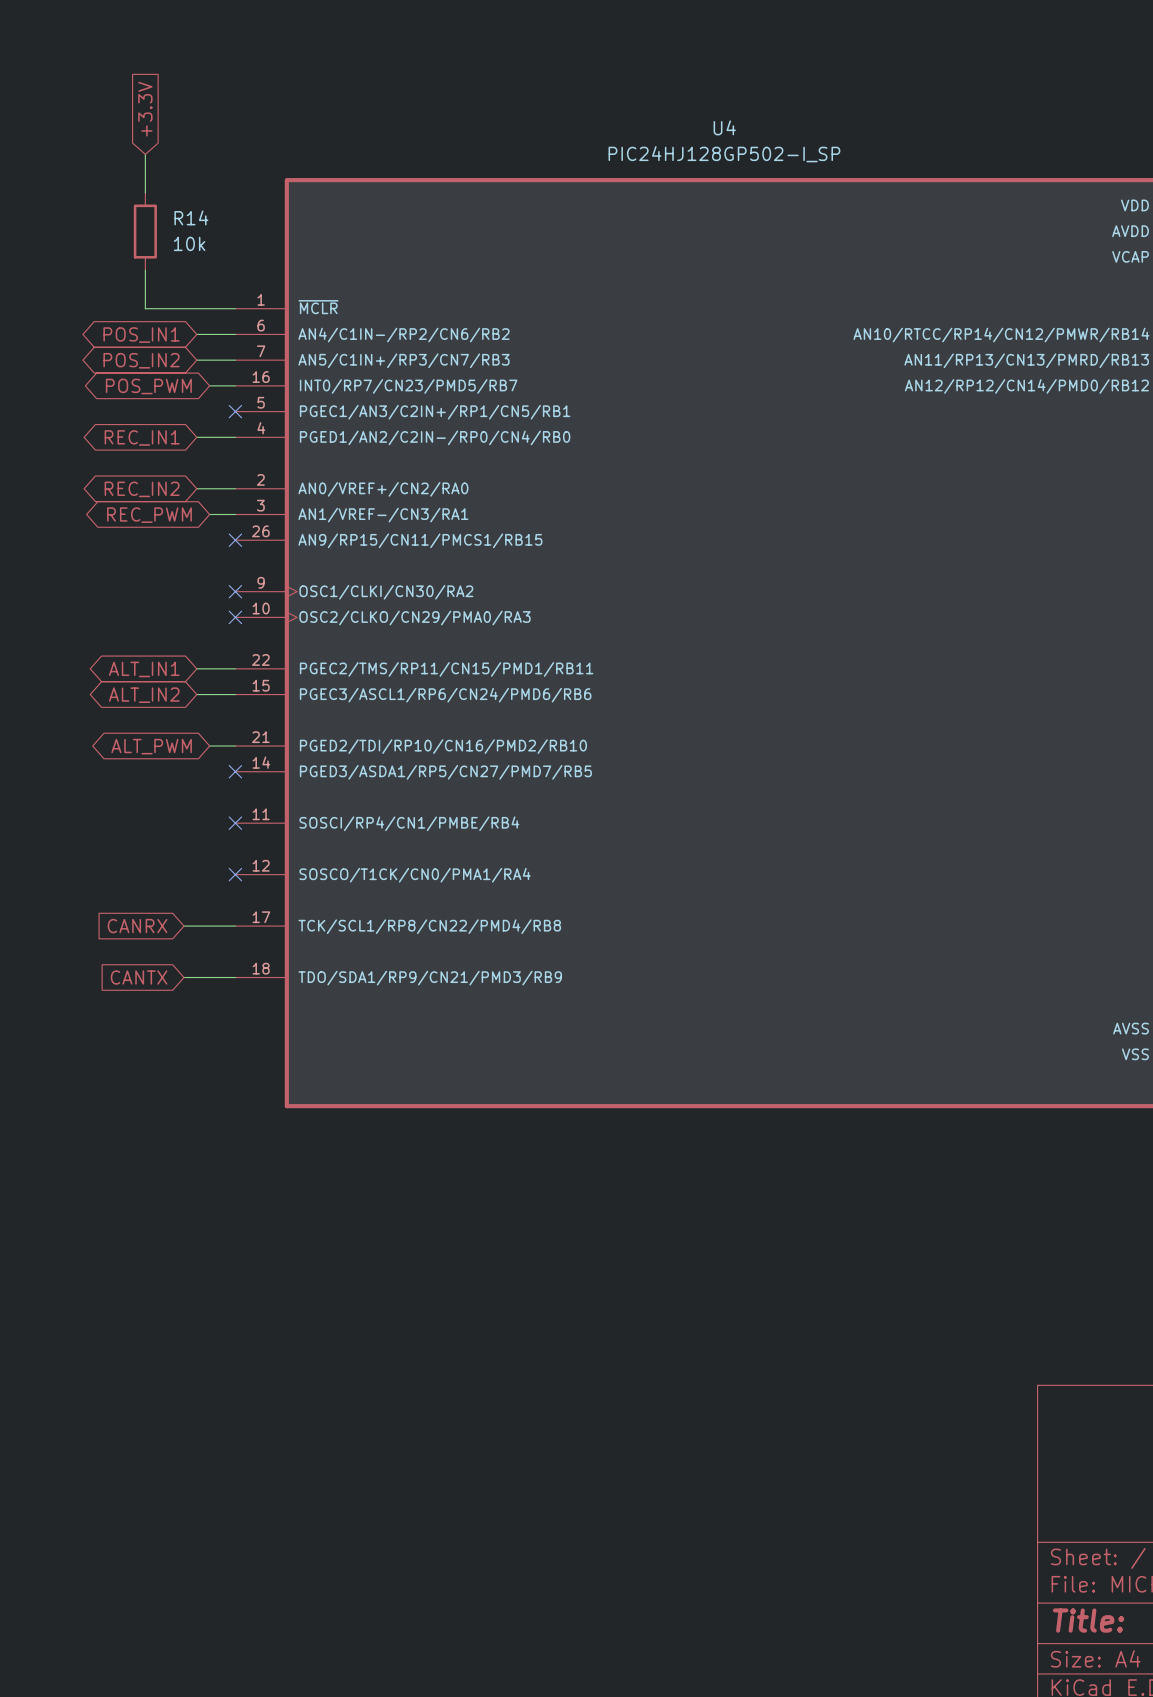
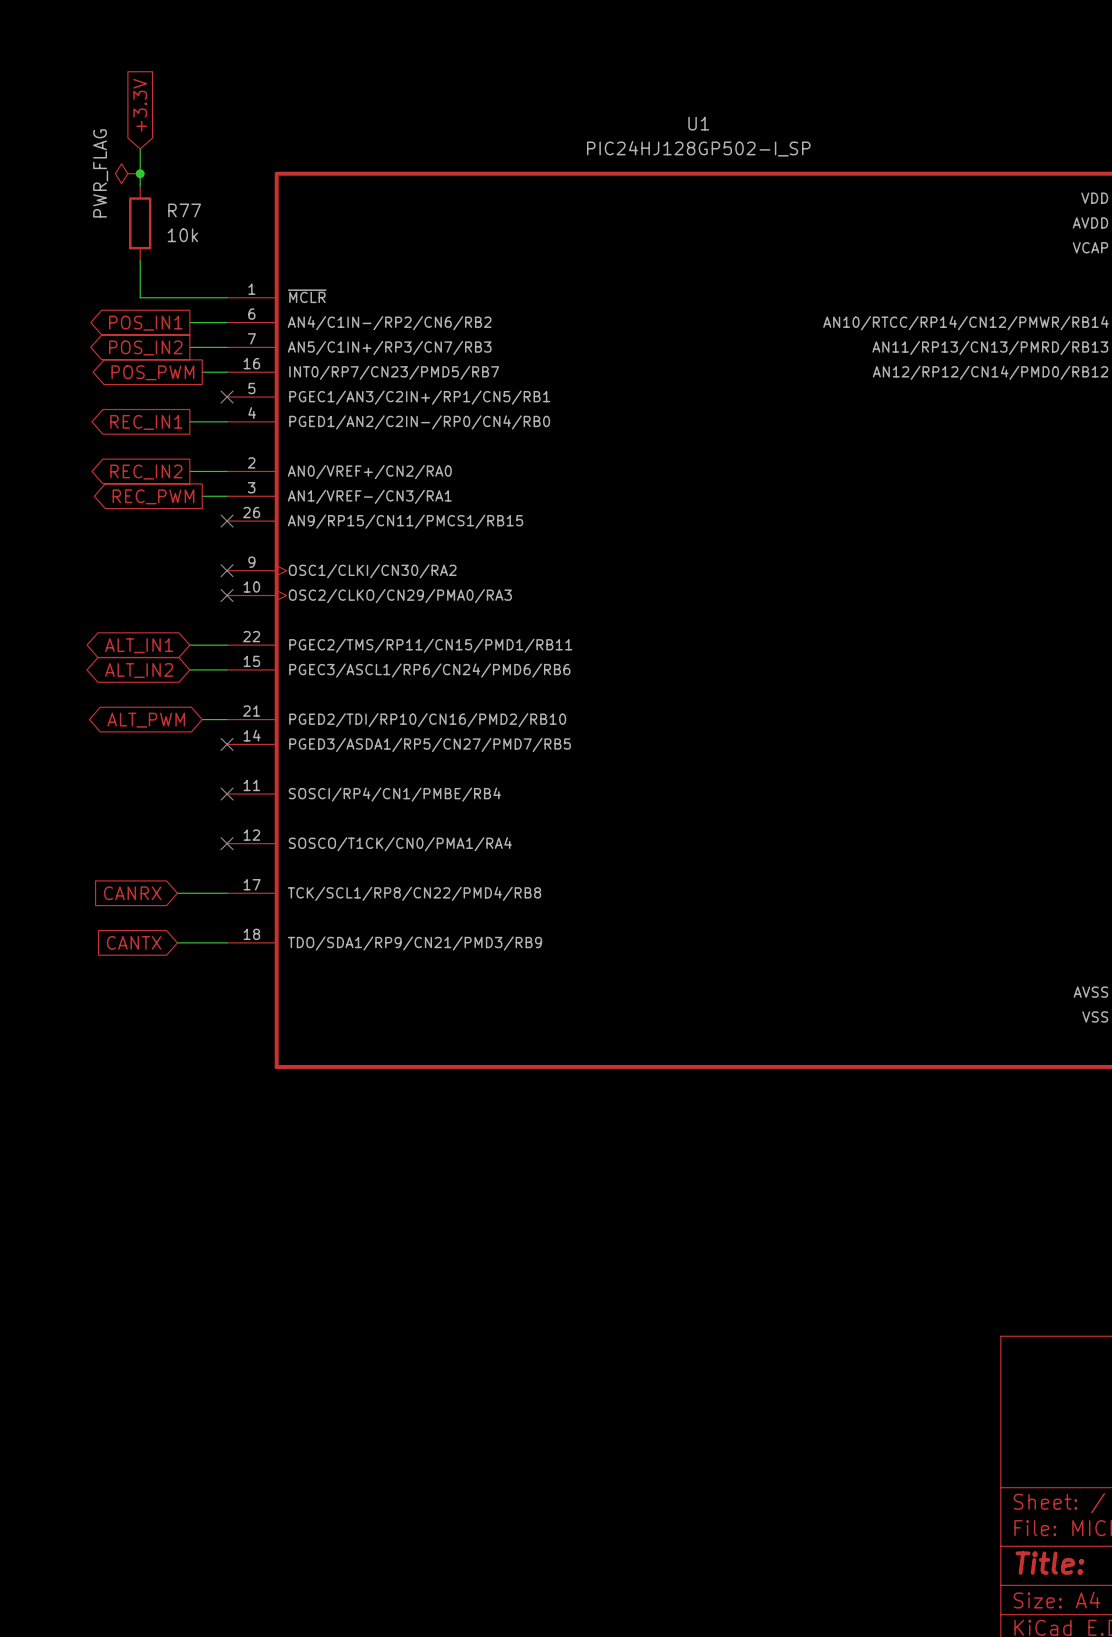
U4 name: U4 (724, 127) -> U1 (698, 123)
power symbol: none -> PWR_FLAG (127, 173)
junction: none -> (140, 173)
R14 name: R14 (191, 217) -> R77 (184, 210)
global label shape: bidirectional (141, 335) -> output (145, 323)
global label shape: bidirectional (141, 360) -> output (145, 347)
global label shape: bidirectional (148, 386) -> output (152, 372)
global label shape: bidirectional (142, 437) -> output (146, 422)
global label shape: bidirectional (142, 489) -> output (146, 472)
global label shape: bidirectional (149, 515) -> output (153, 496)

